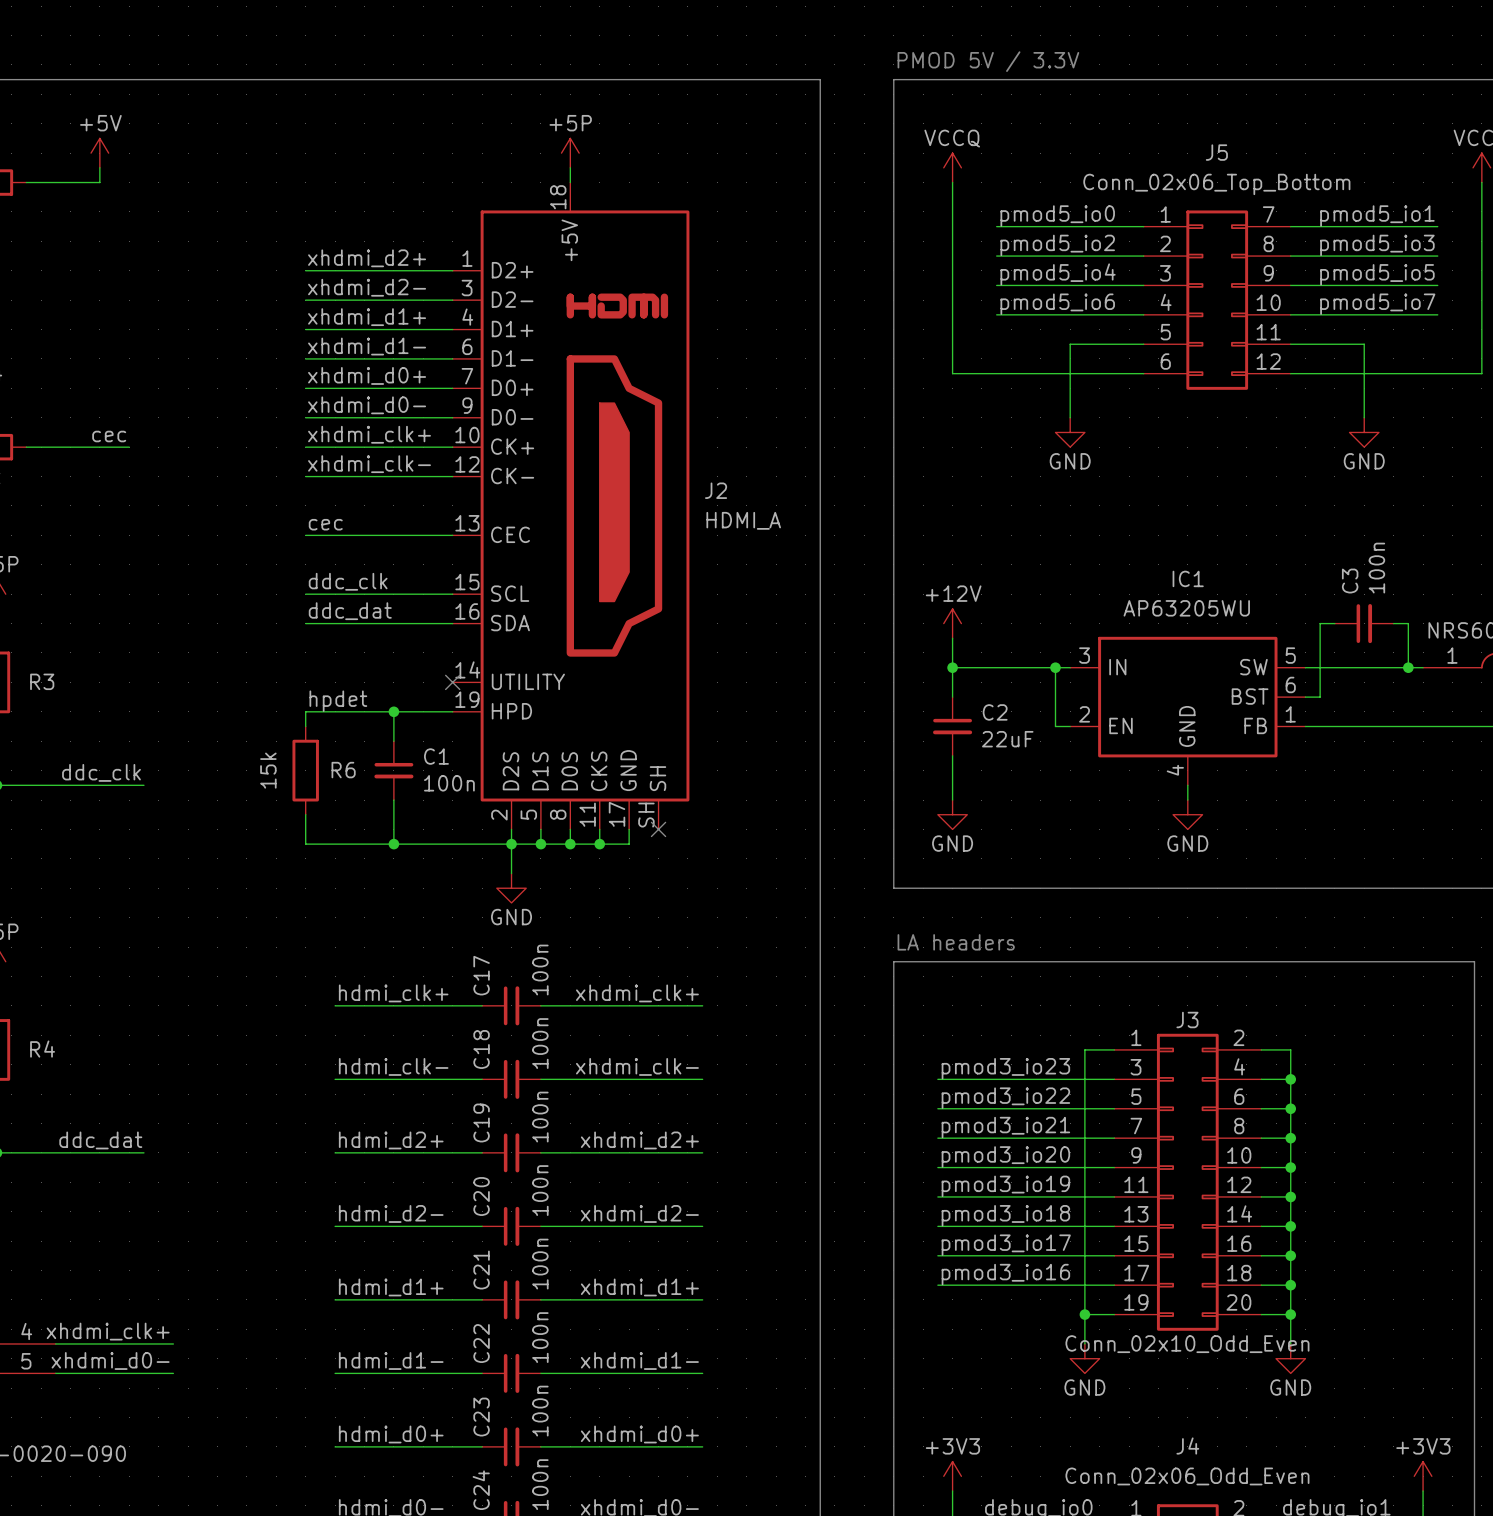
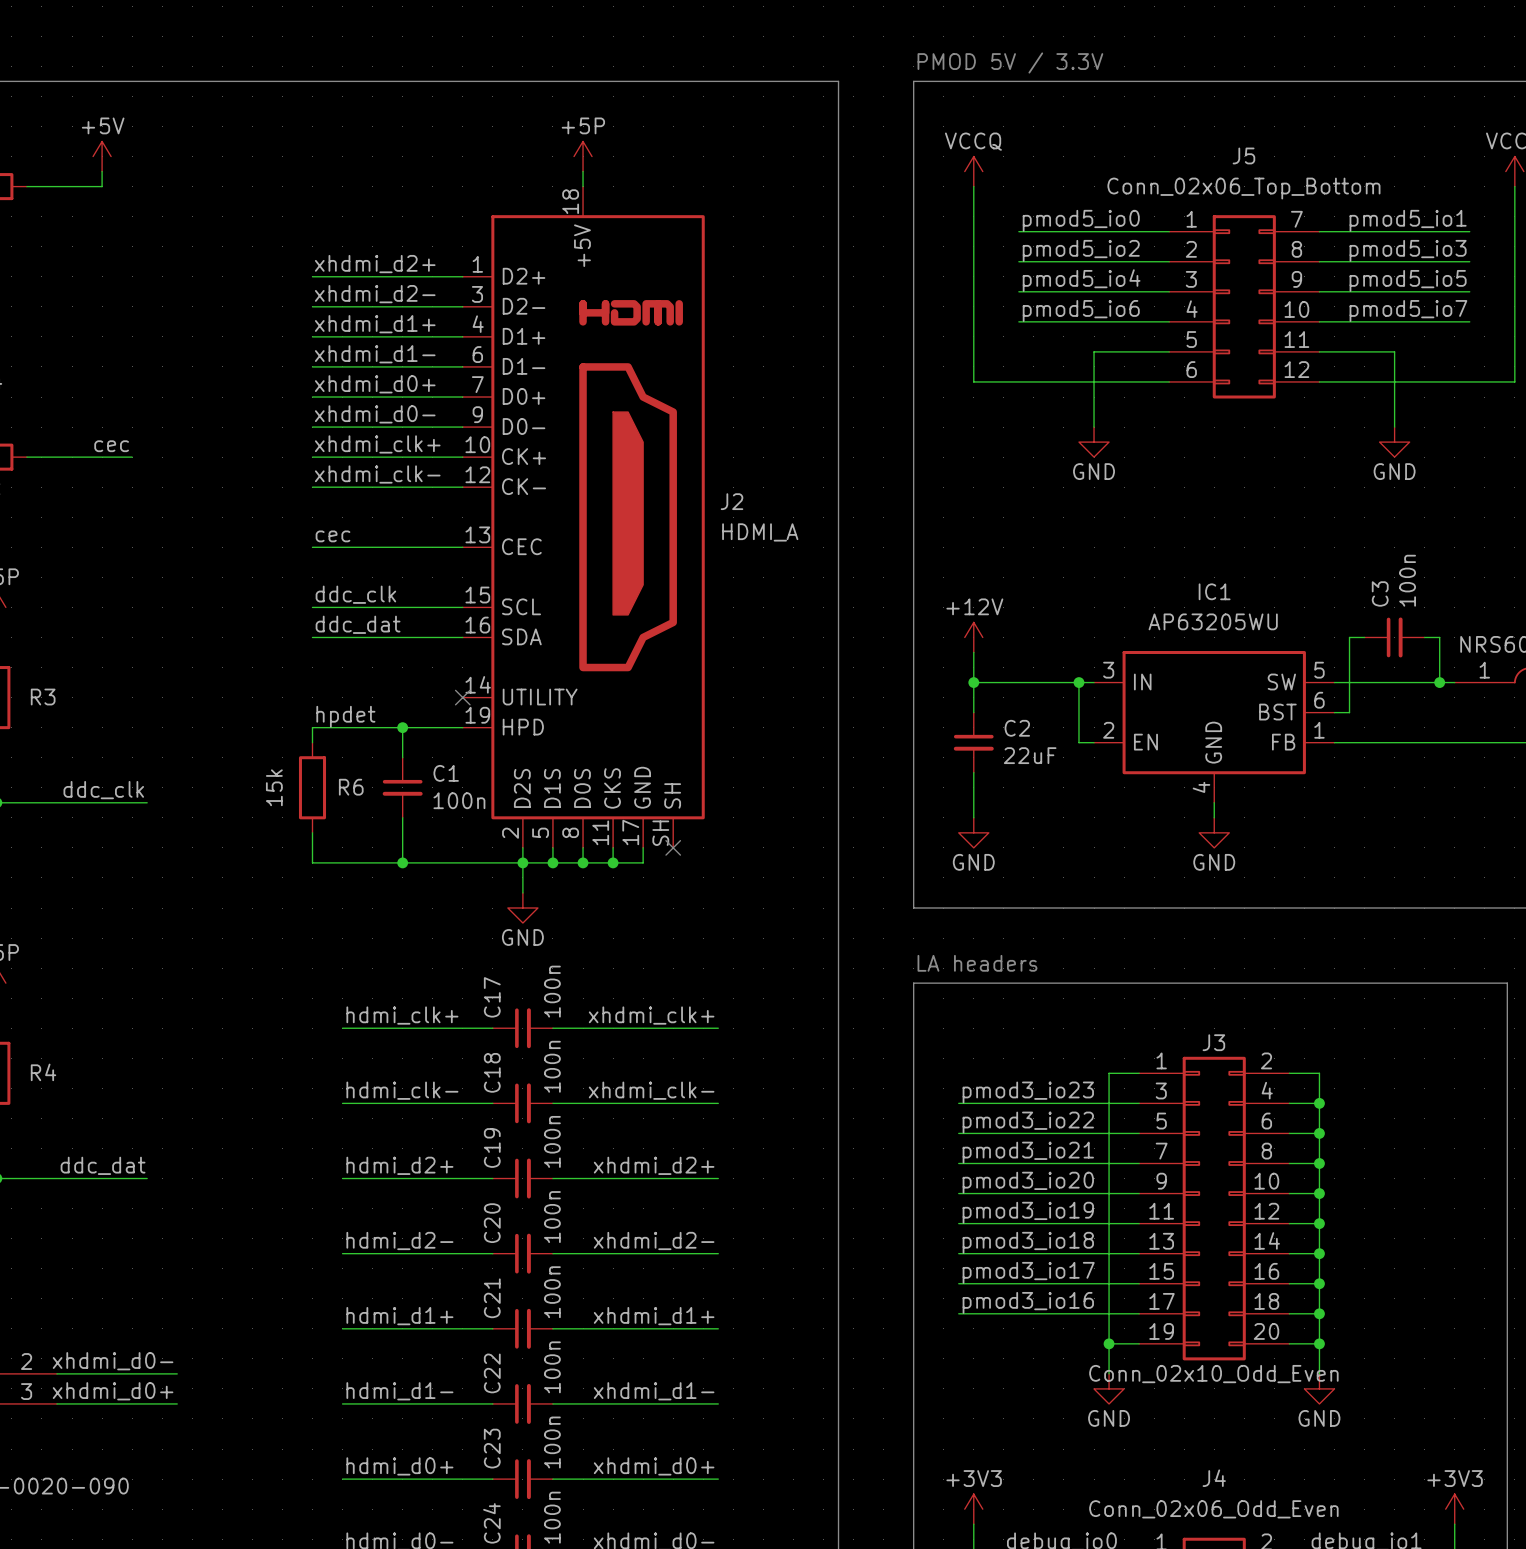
part pin number: 4 (26, 1331) -> 2 (26, 1361)
label: xhdmi_clk+ (108, 1331) -> xhdmi_d0- (113, 1361)
label: xhdmi_d0- (110, 1360) -> xhdmi_d0+ (113, 1391)
part pin number: 5 (26, 1361) -> 3 (26, 1391)

